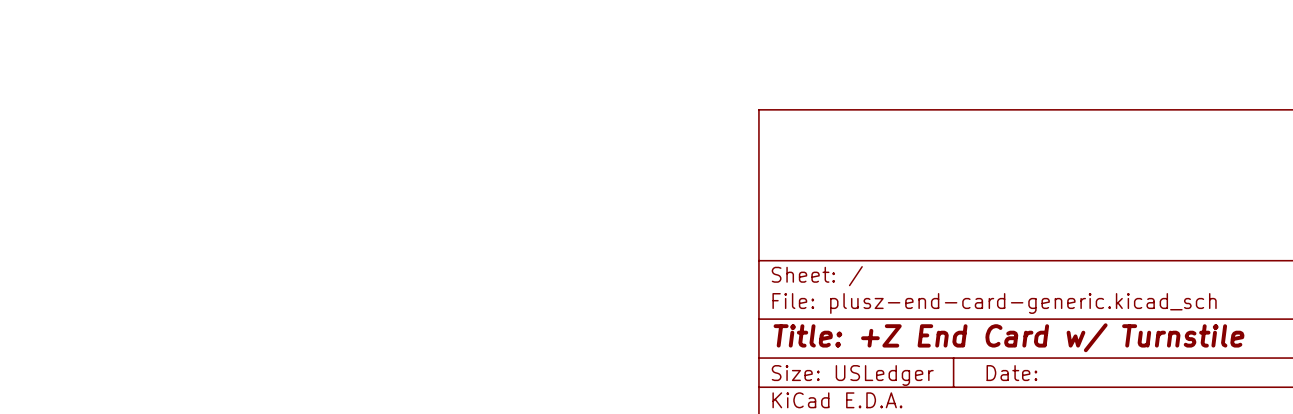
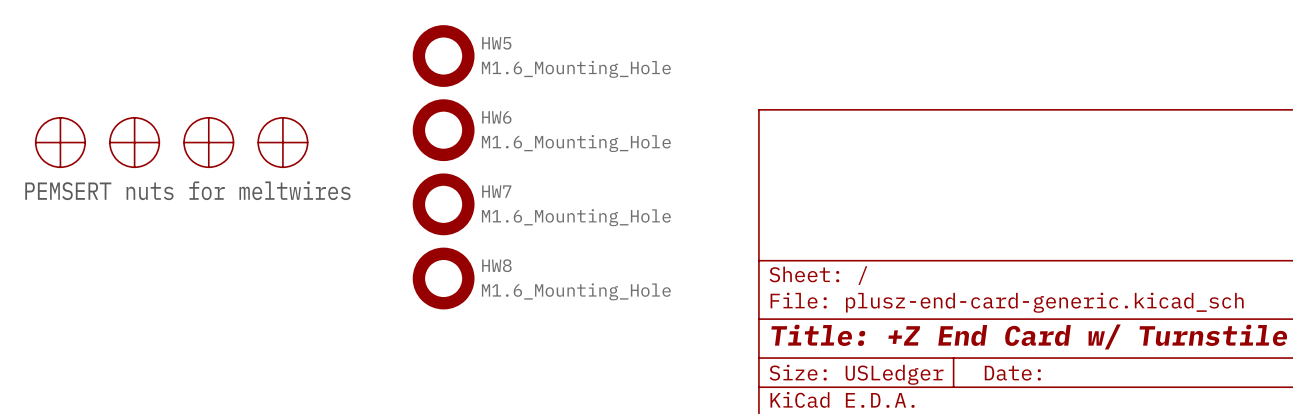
HW5: none -> M1.6_Mounting_Hole (443, 56)
HW6: none -> M1.6_Mounting_Hole (443, 130)
part: none -> (60, 142)
part: none -> (134, 142)
part: none -> (208, 142)
part: none -> (282, 142)
text: none -> PEMSERT nuts for meltwires (187, 190)
HW7: none -> M1.6_Mounting_Hole (443, 204)
HW8: none -> M1.6_Mounting_Hole (443, 278)

